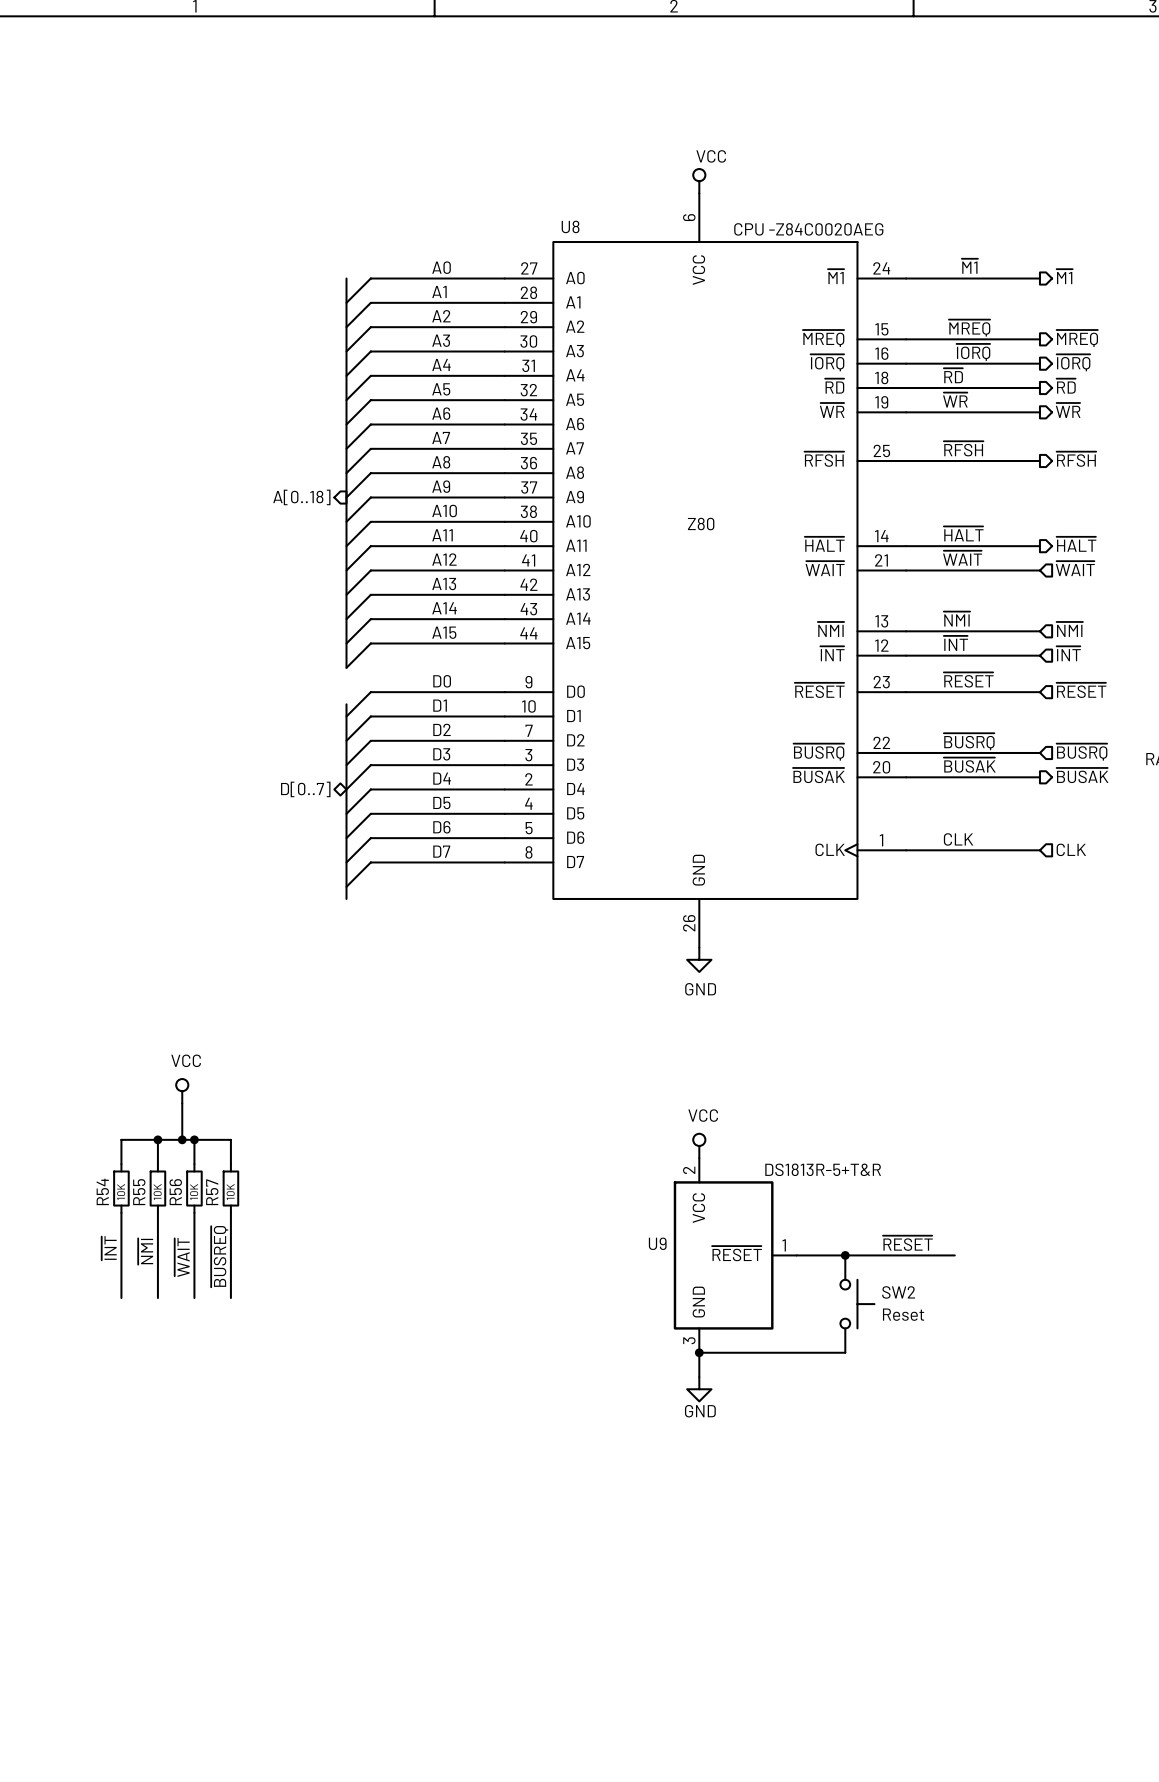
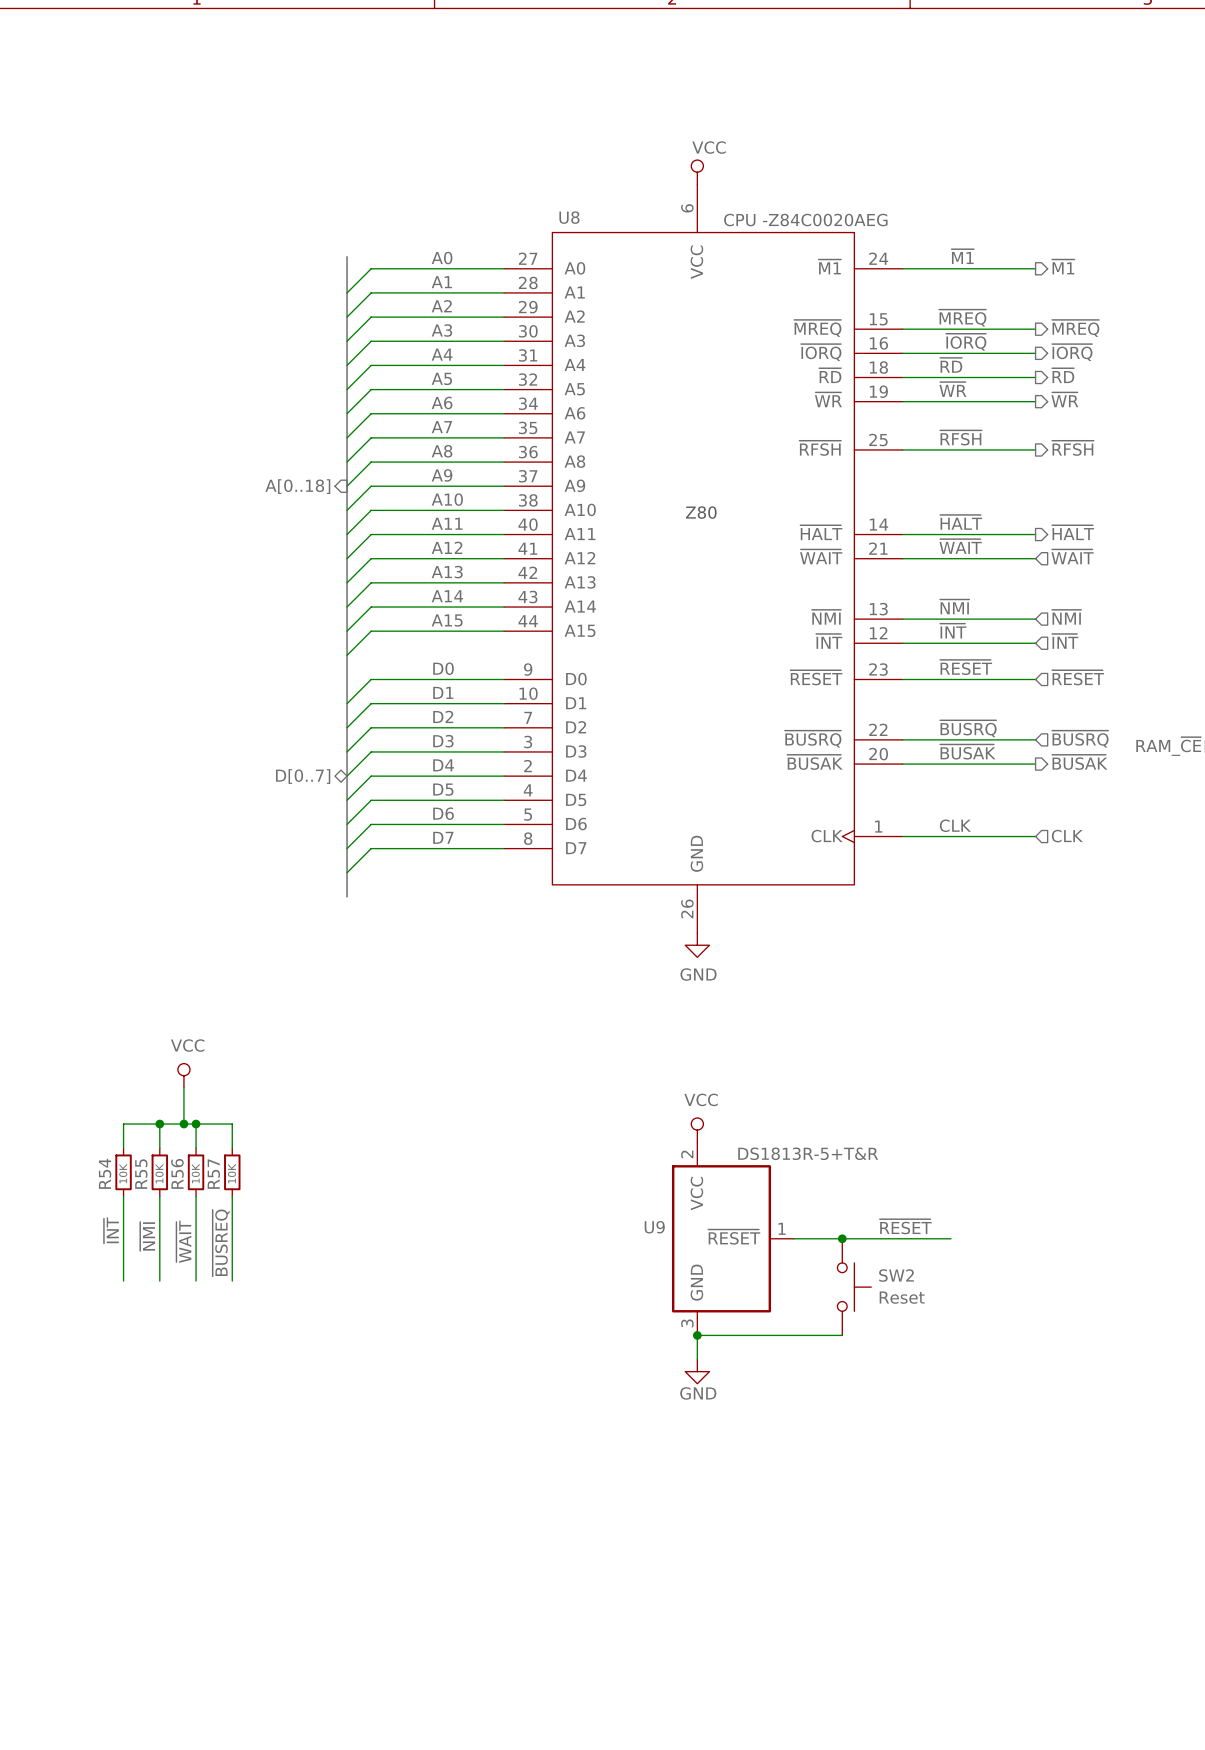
bus: none -> (347, 256) (347, 268)
bus: none -> (347, 655) (347, 691)
bus: none -> (347, 884) (347, 896)

